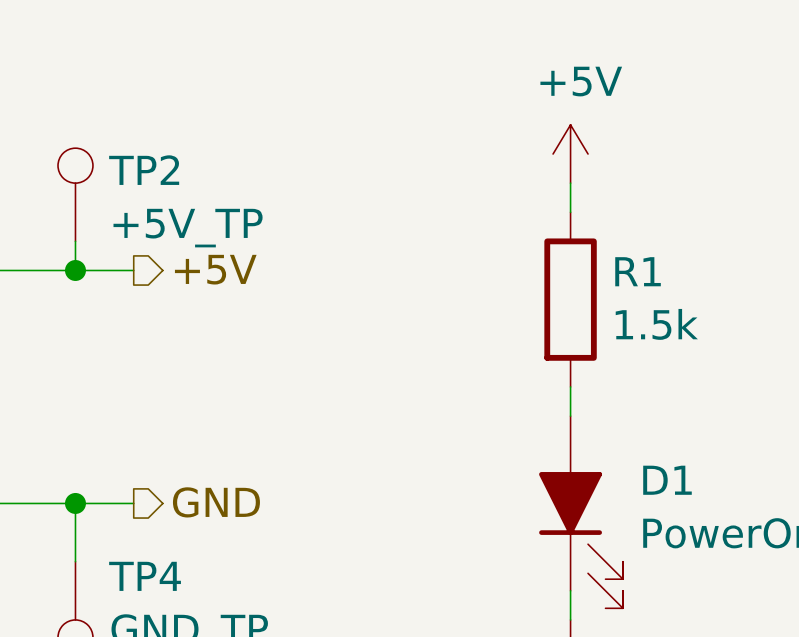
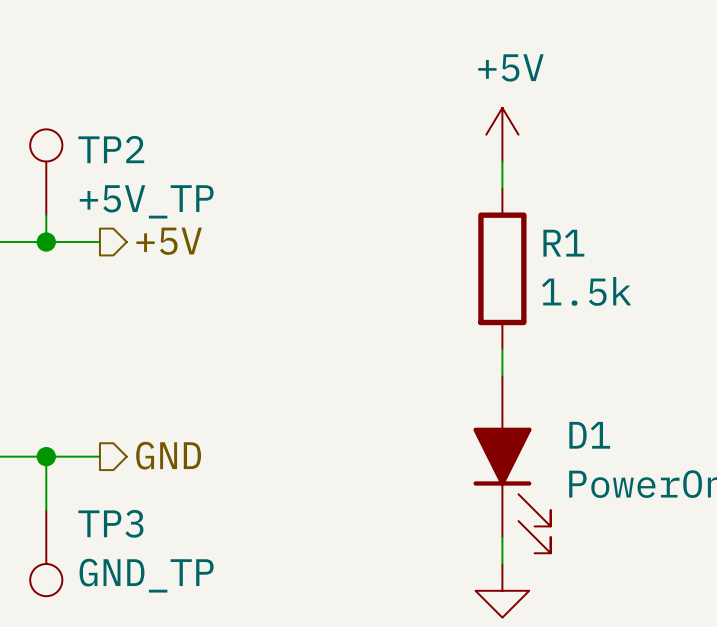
TP4 name: TP4 (145, 576) -> TP3 (110, 523)

